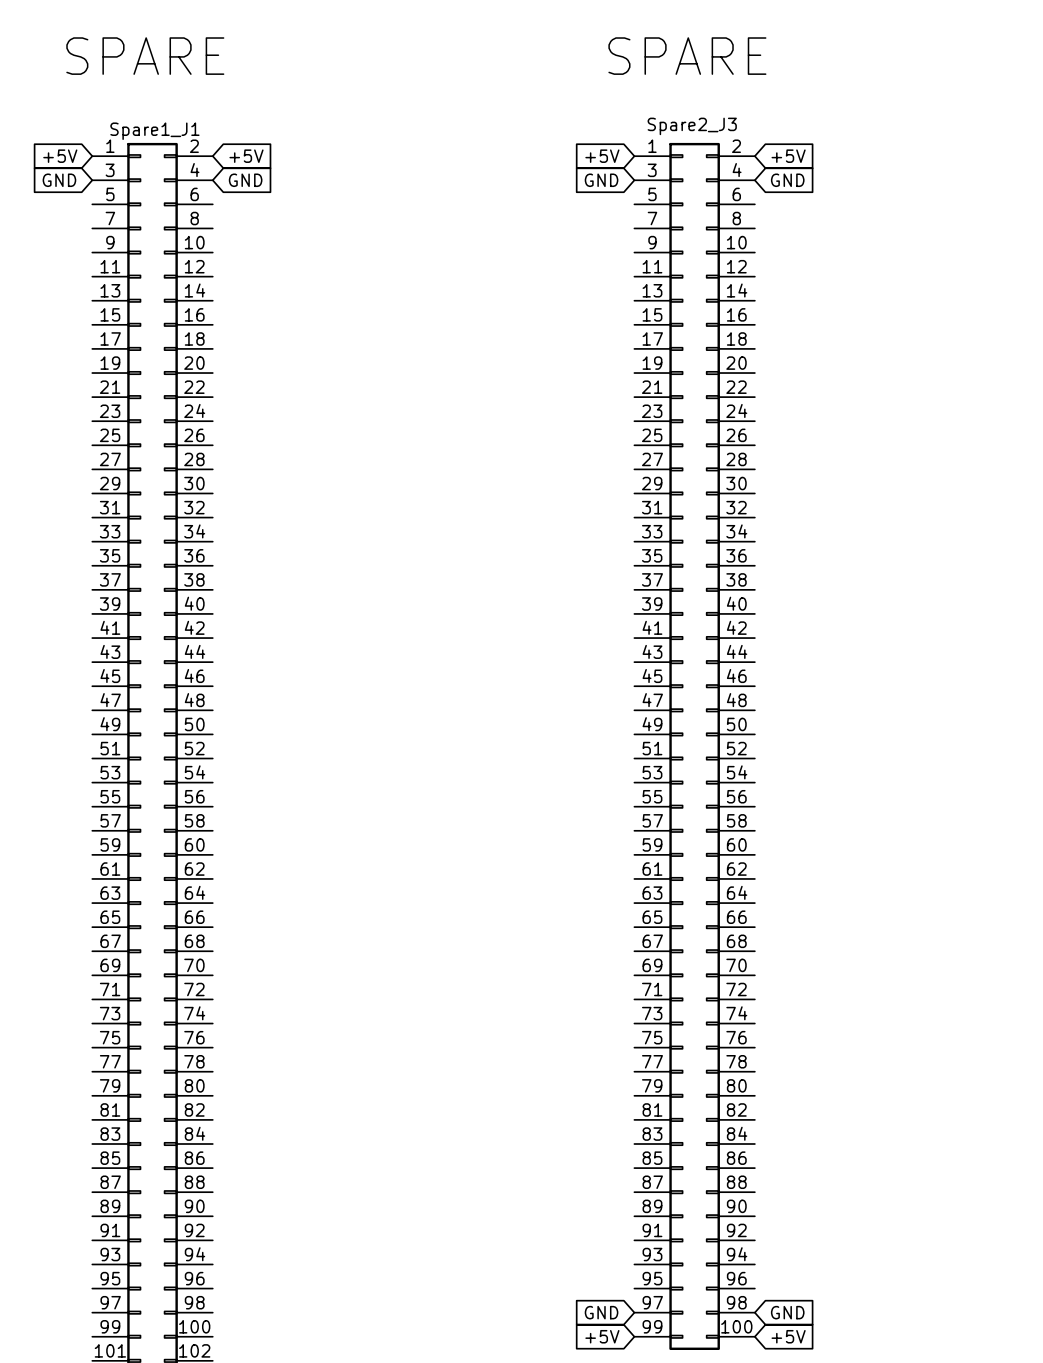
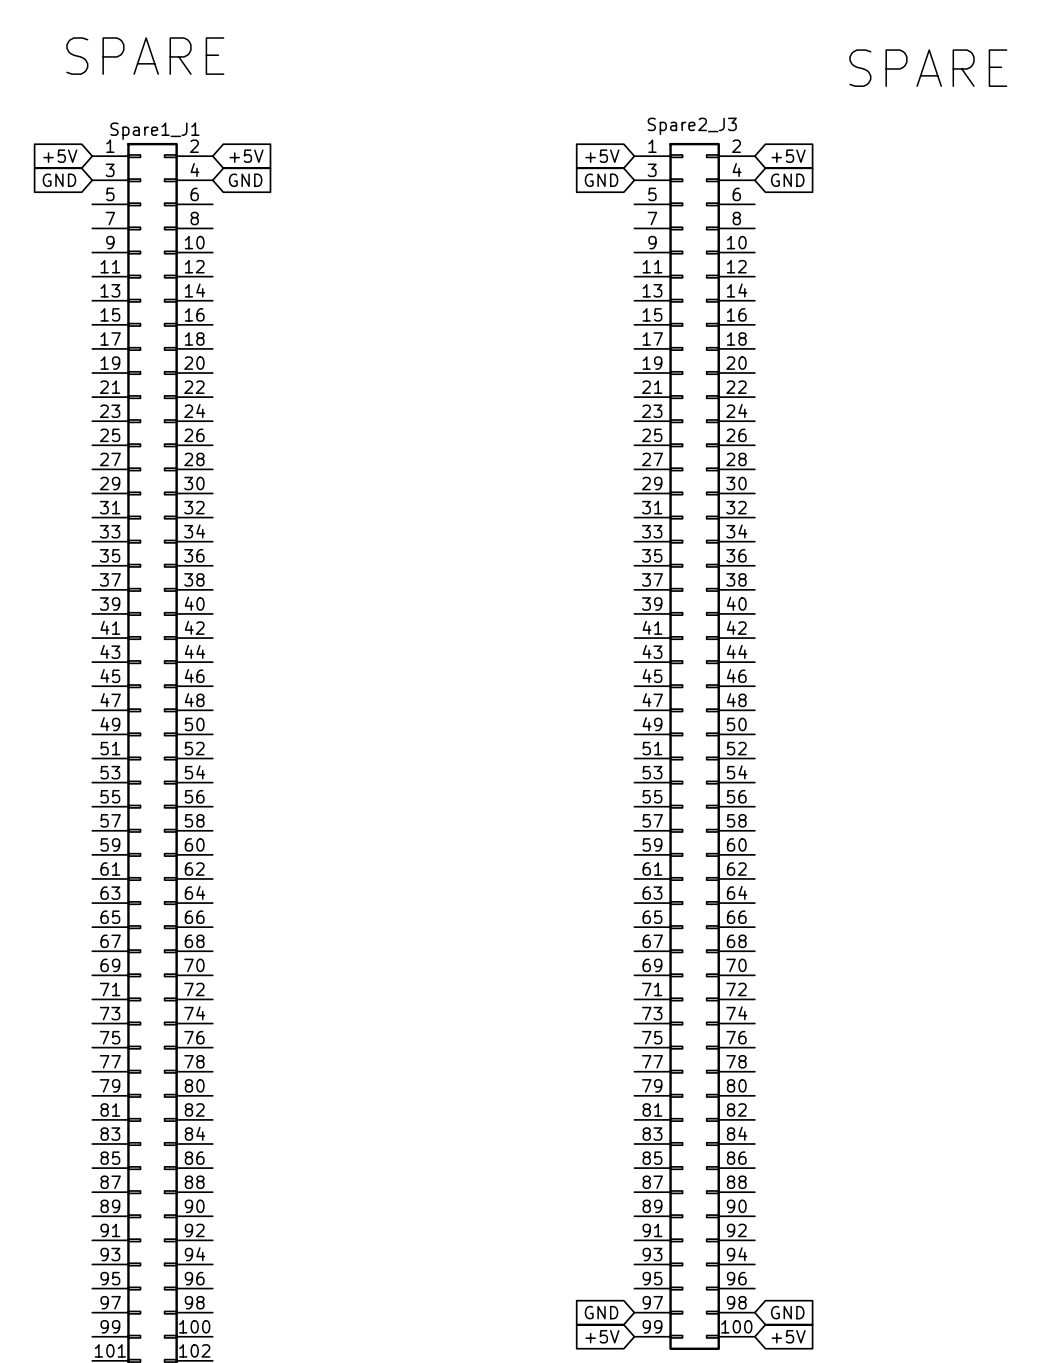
text: SPARE (687, 56) -> none
text: none -> SPARE (928, 68)

